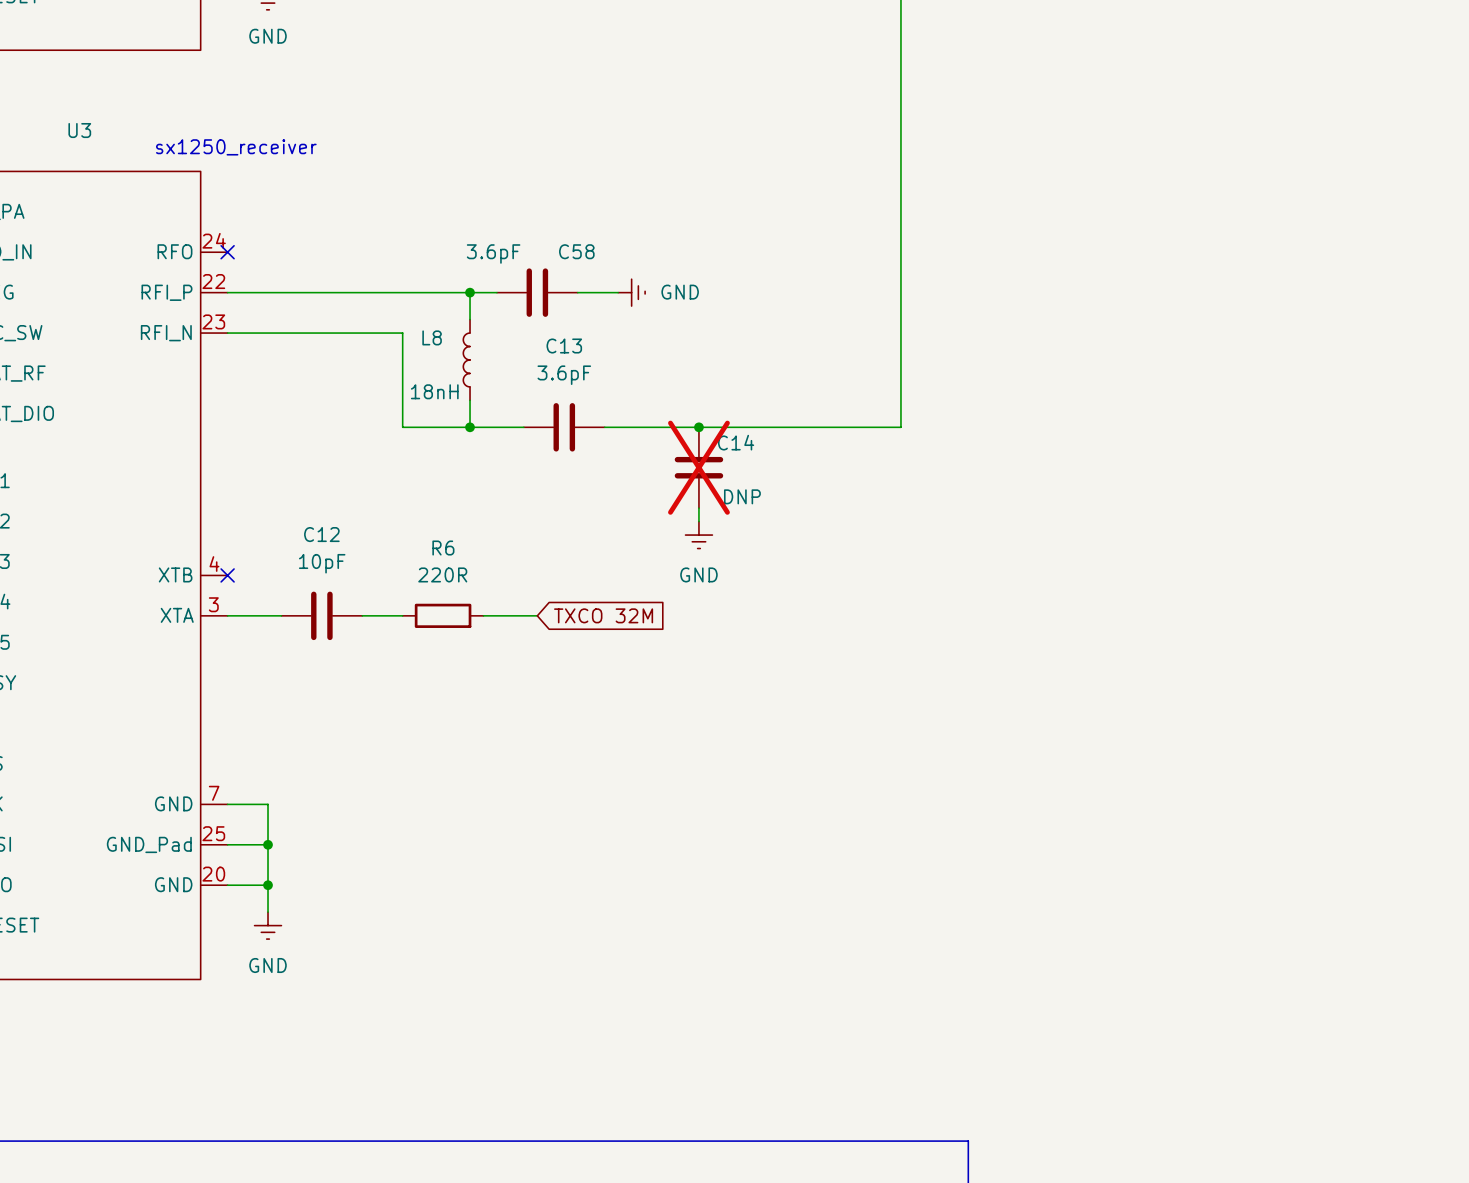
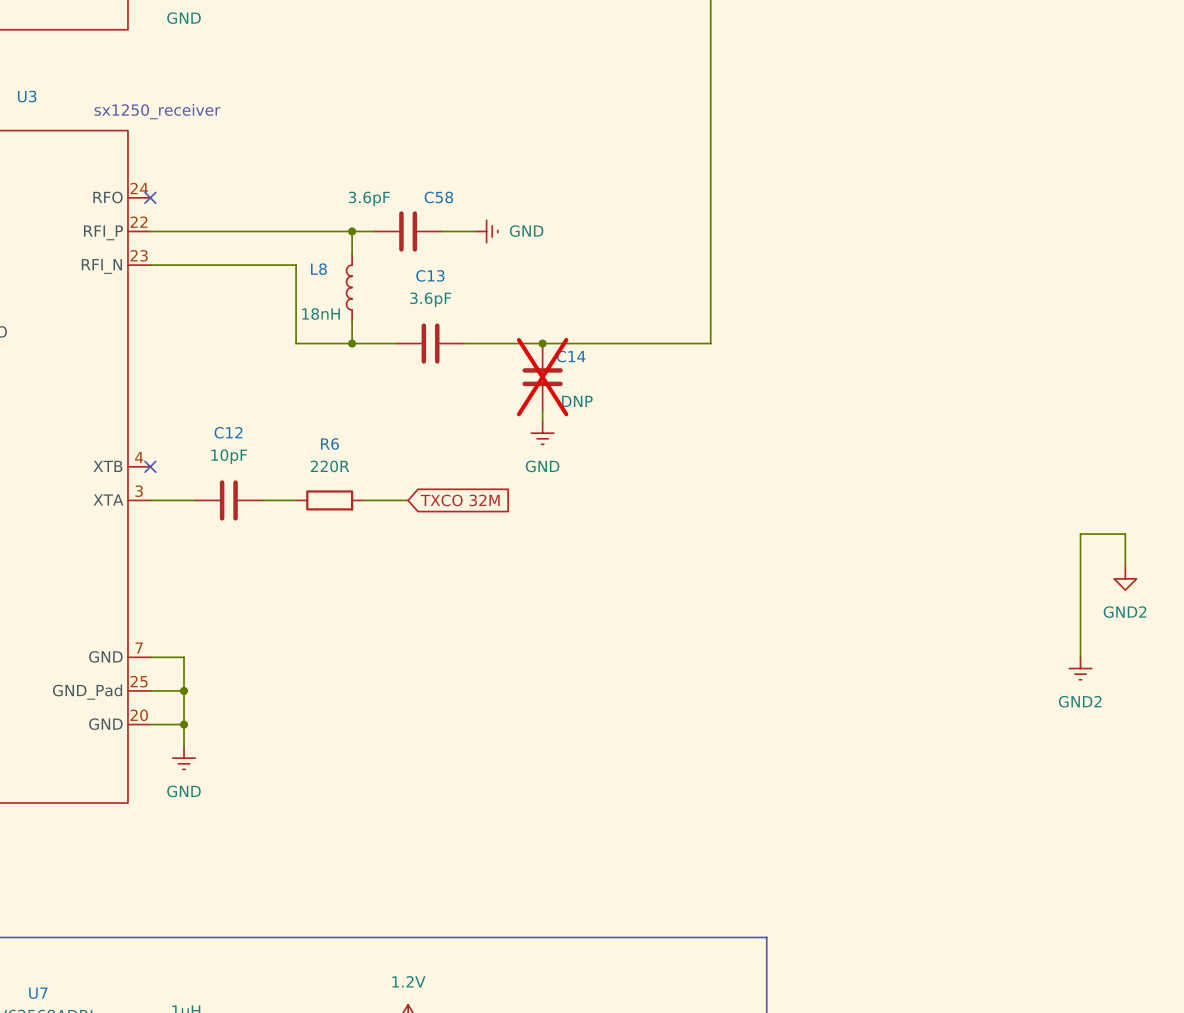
wire: none -> (1125, 567) (1125, 534) (1080, 534) (1080, 657)
power symbol: none -> GND2 (1125, 578)
power symbol: none -> GND2 (1080, 668)

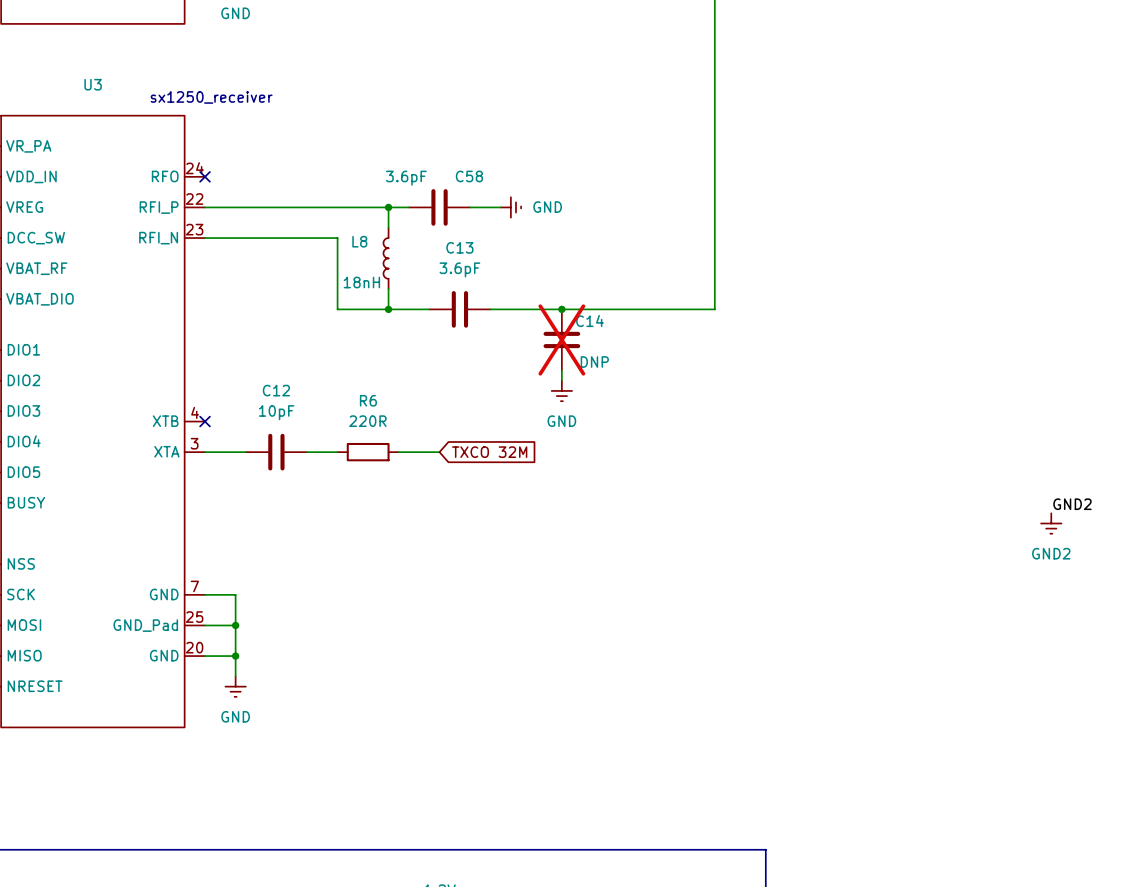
label: none -> GND2 (1072, 504)
wire: (1125, 567) (1125, 534) (1080, 534) (1080, 657) -> none
power symbol: GND2 (1125, 578) -> none
power symbol position: GND2 (1080, 668) -> GND2 (1051, 523)

